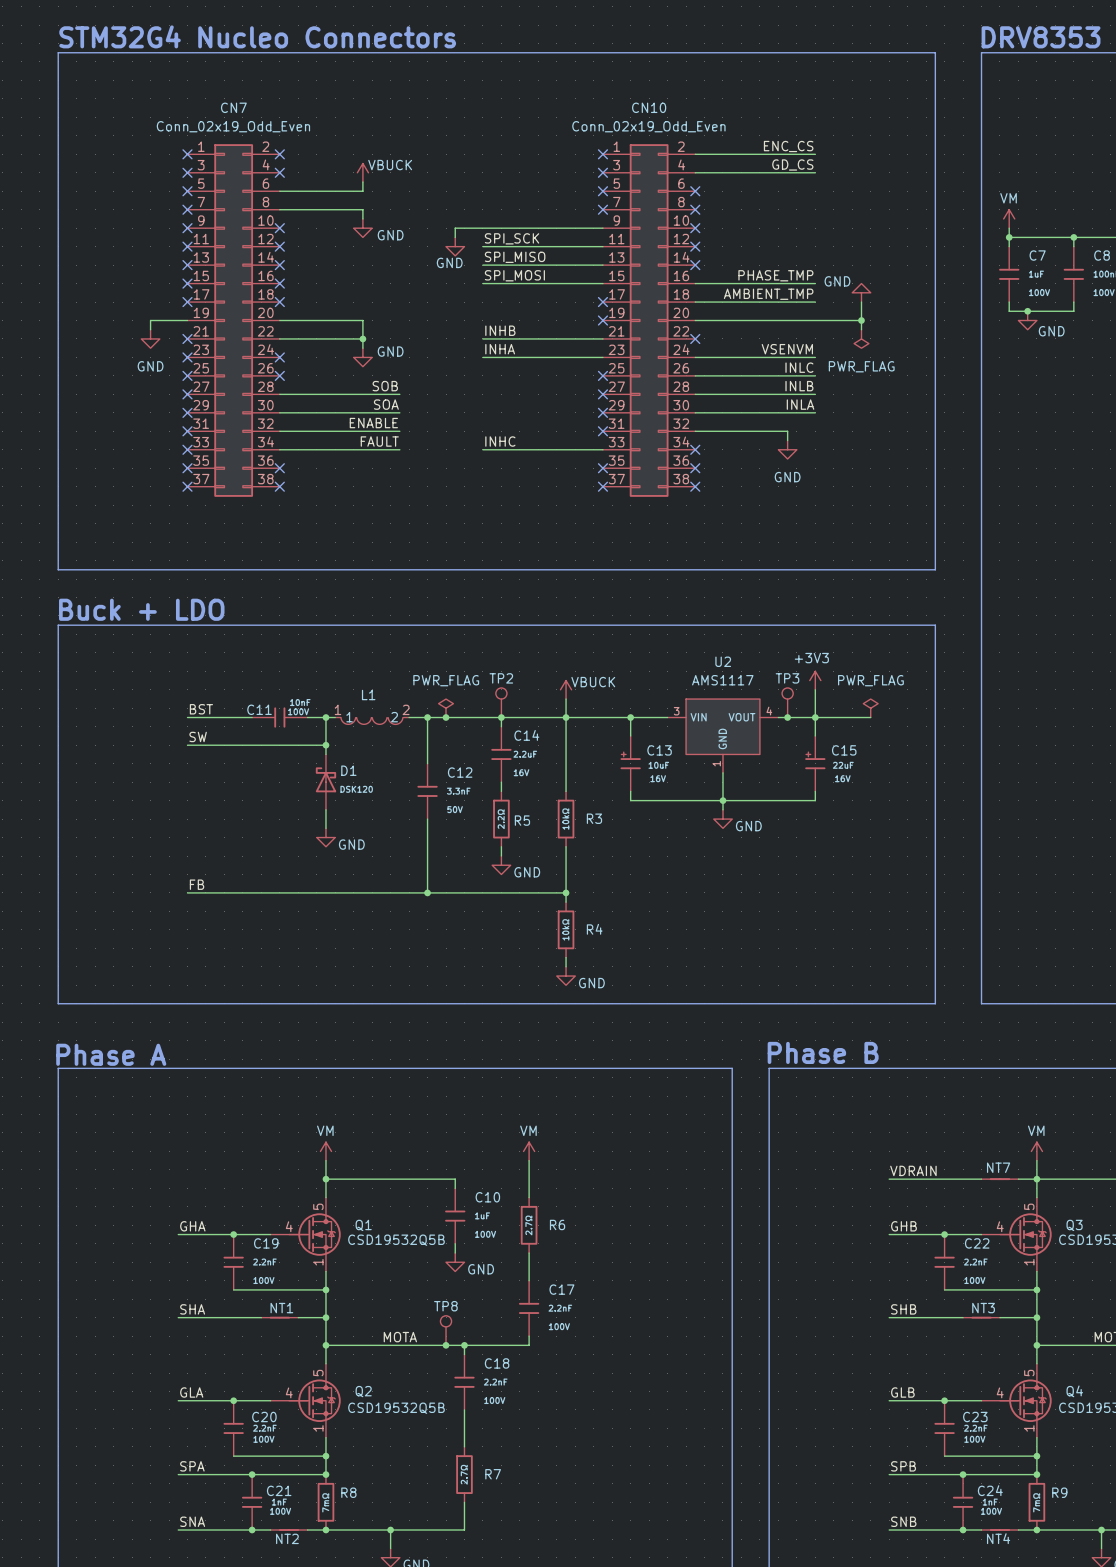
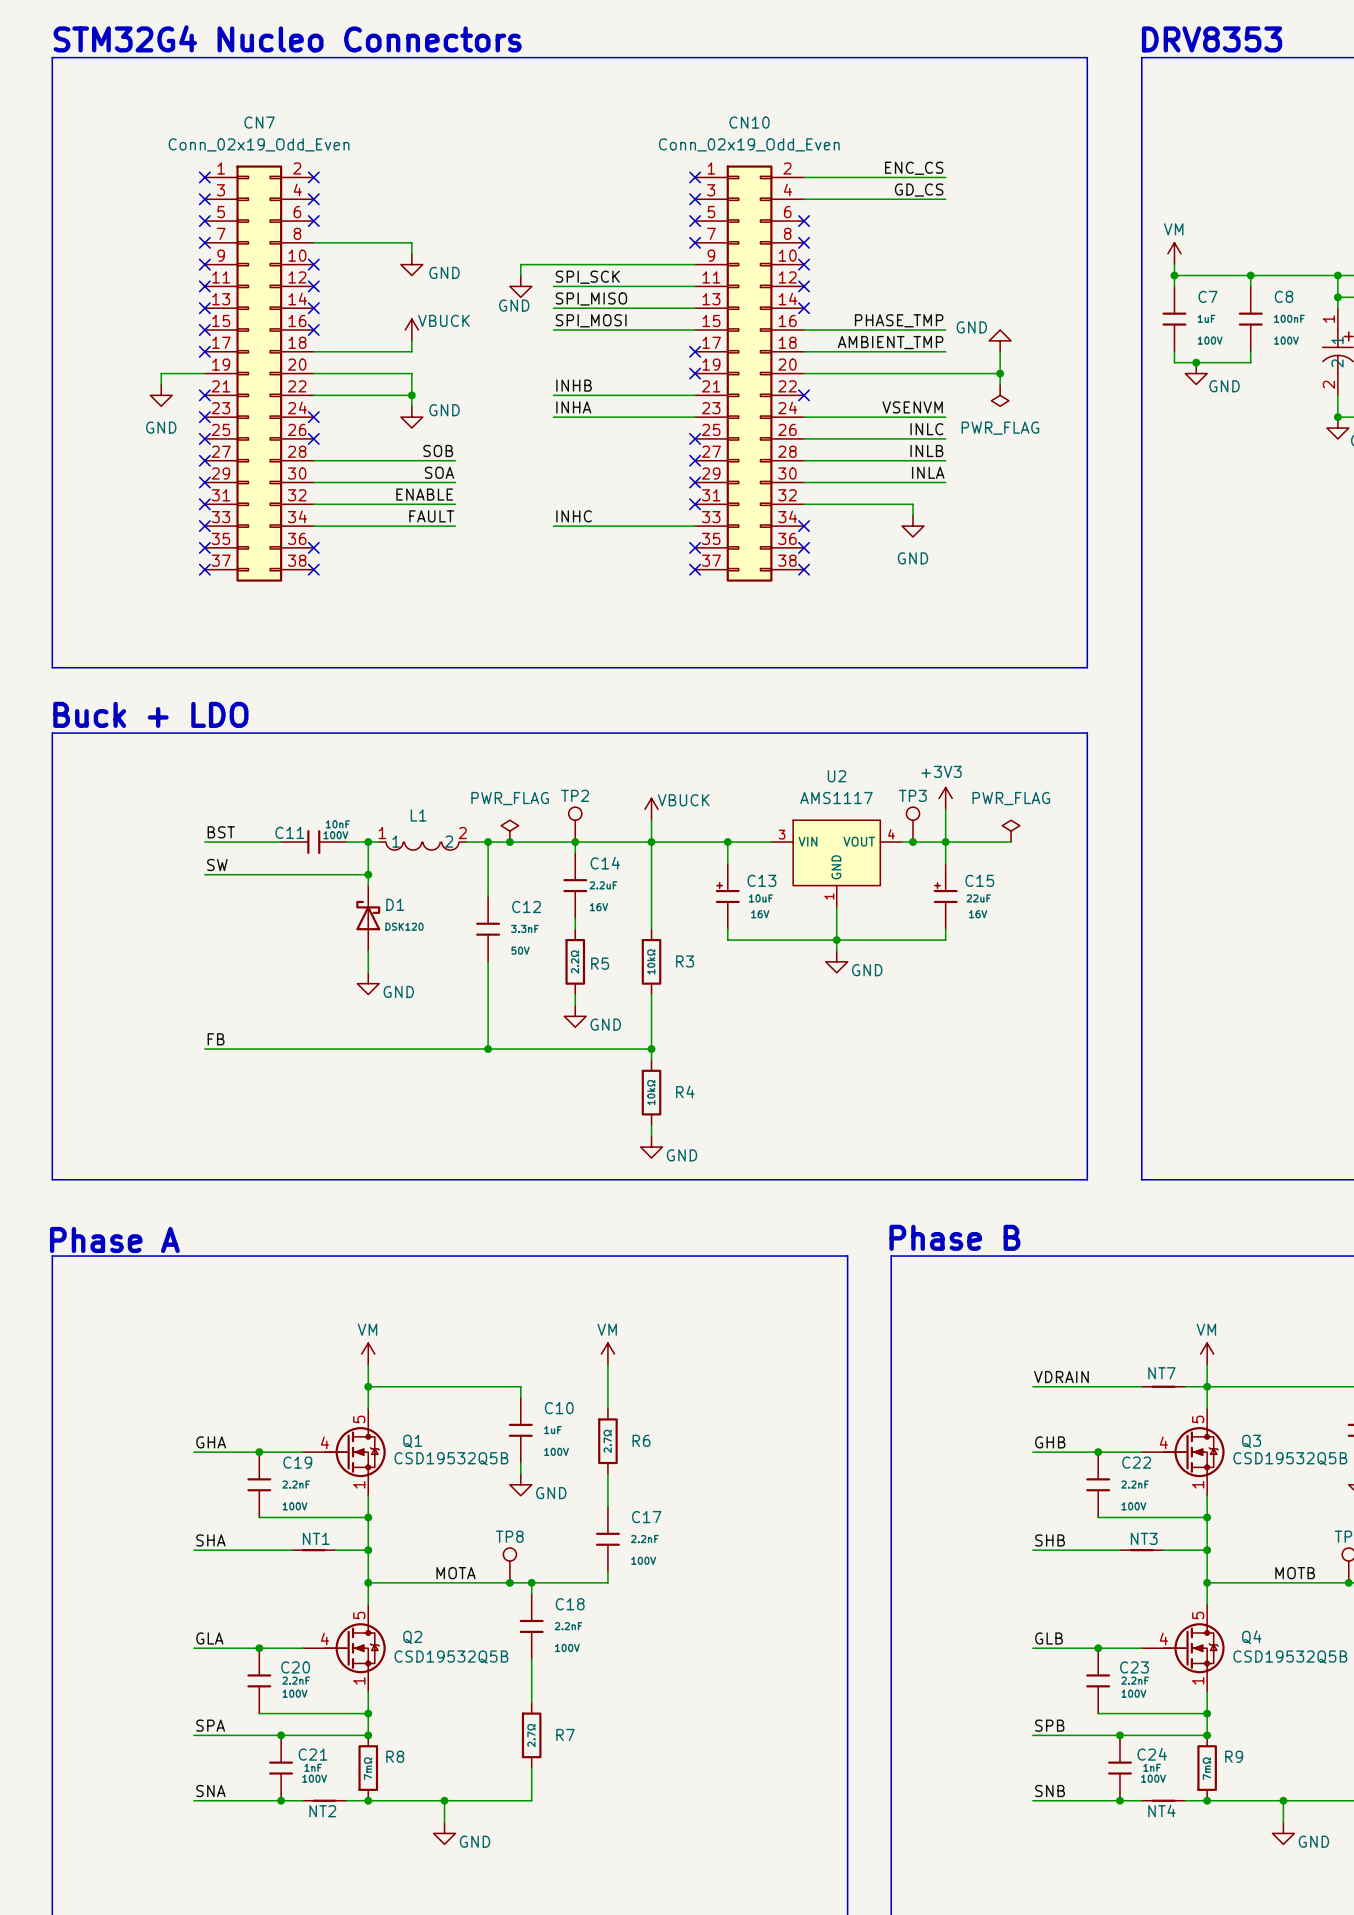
power symbol position: VBUCK (362, 172) -> VBUCK (411, 329)
wire: (362, 182) (362, 191) (279, 191) -> (411, 340) (411, 351) (313, 351)
no-connect mark: none -> (313, 221)
no-connect mark: (279, 302) -> none

